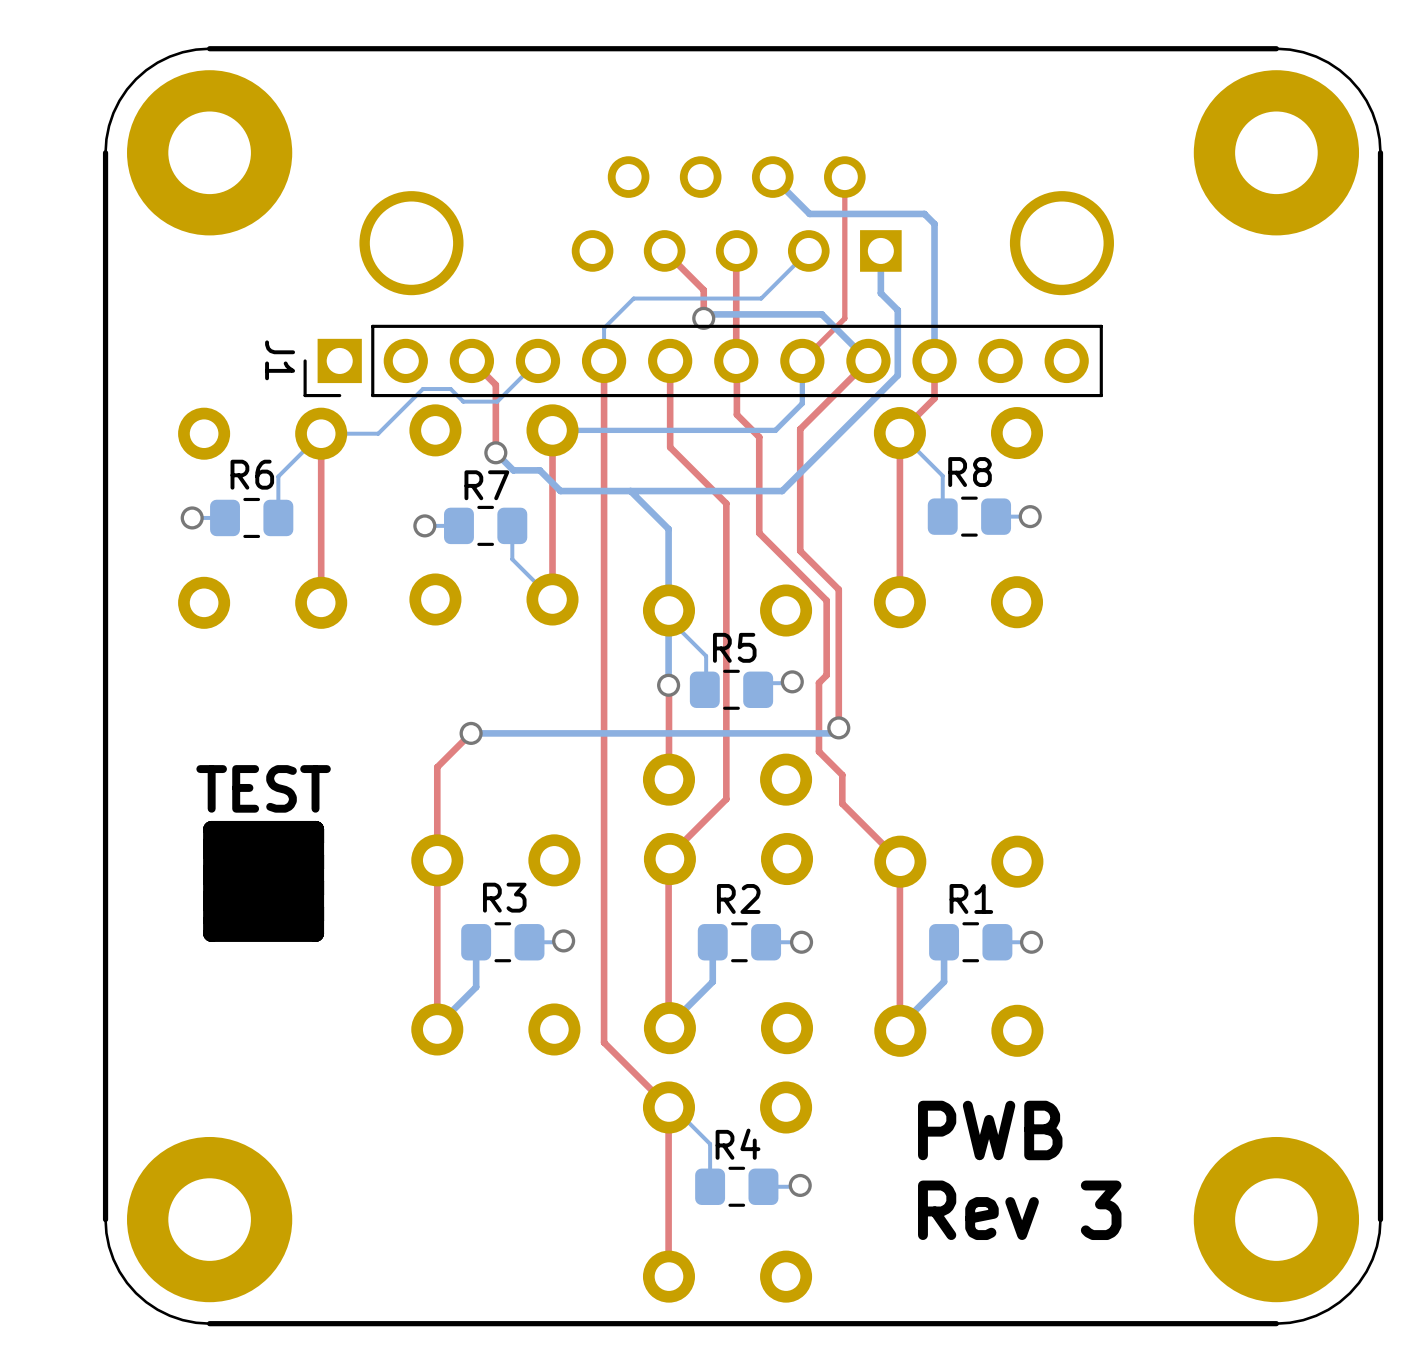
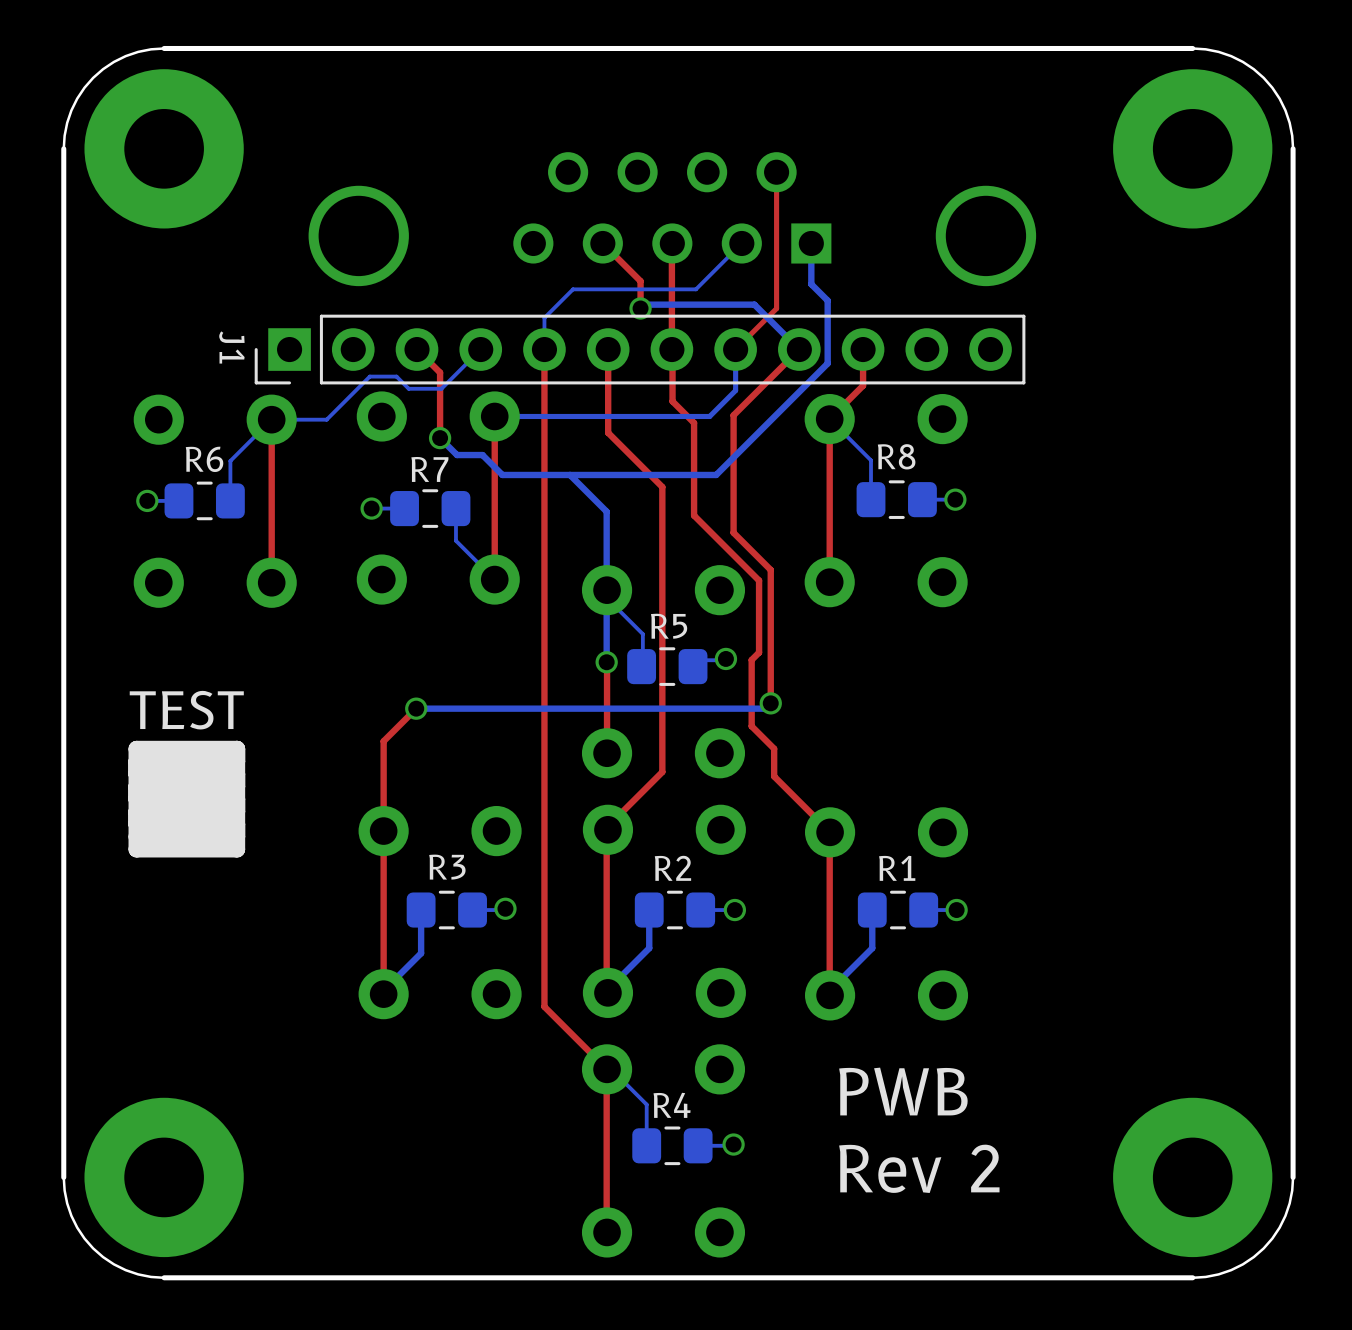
bottom track: (772, 177) (809, 213) (924, 213) (934, 223) (934, 360) -> none
TEST position: (263, 881) -> (186, 799)
text: Rev 3 (1019, 1210) -> Rev 2 (919, 1168)

